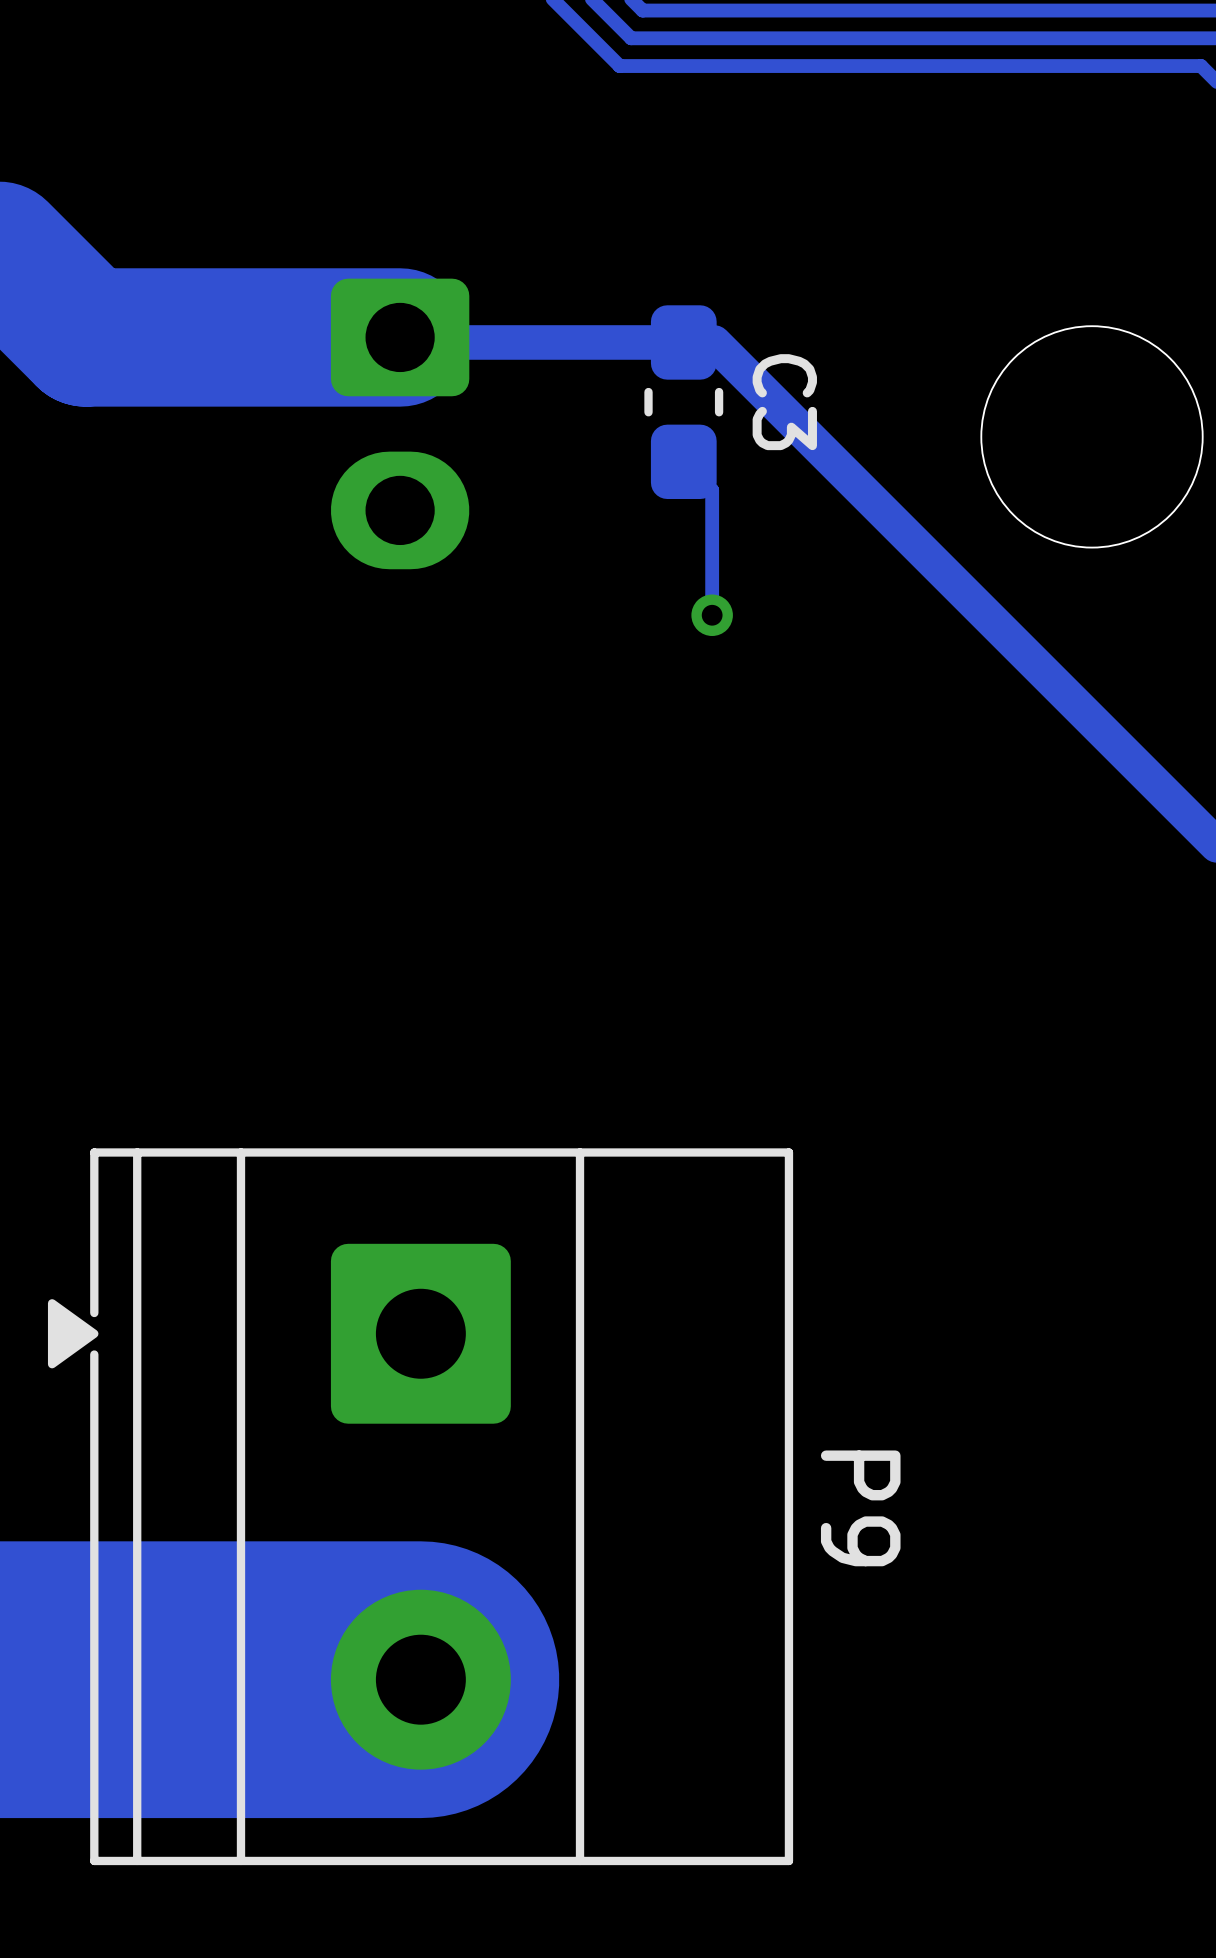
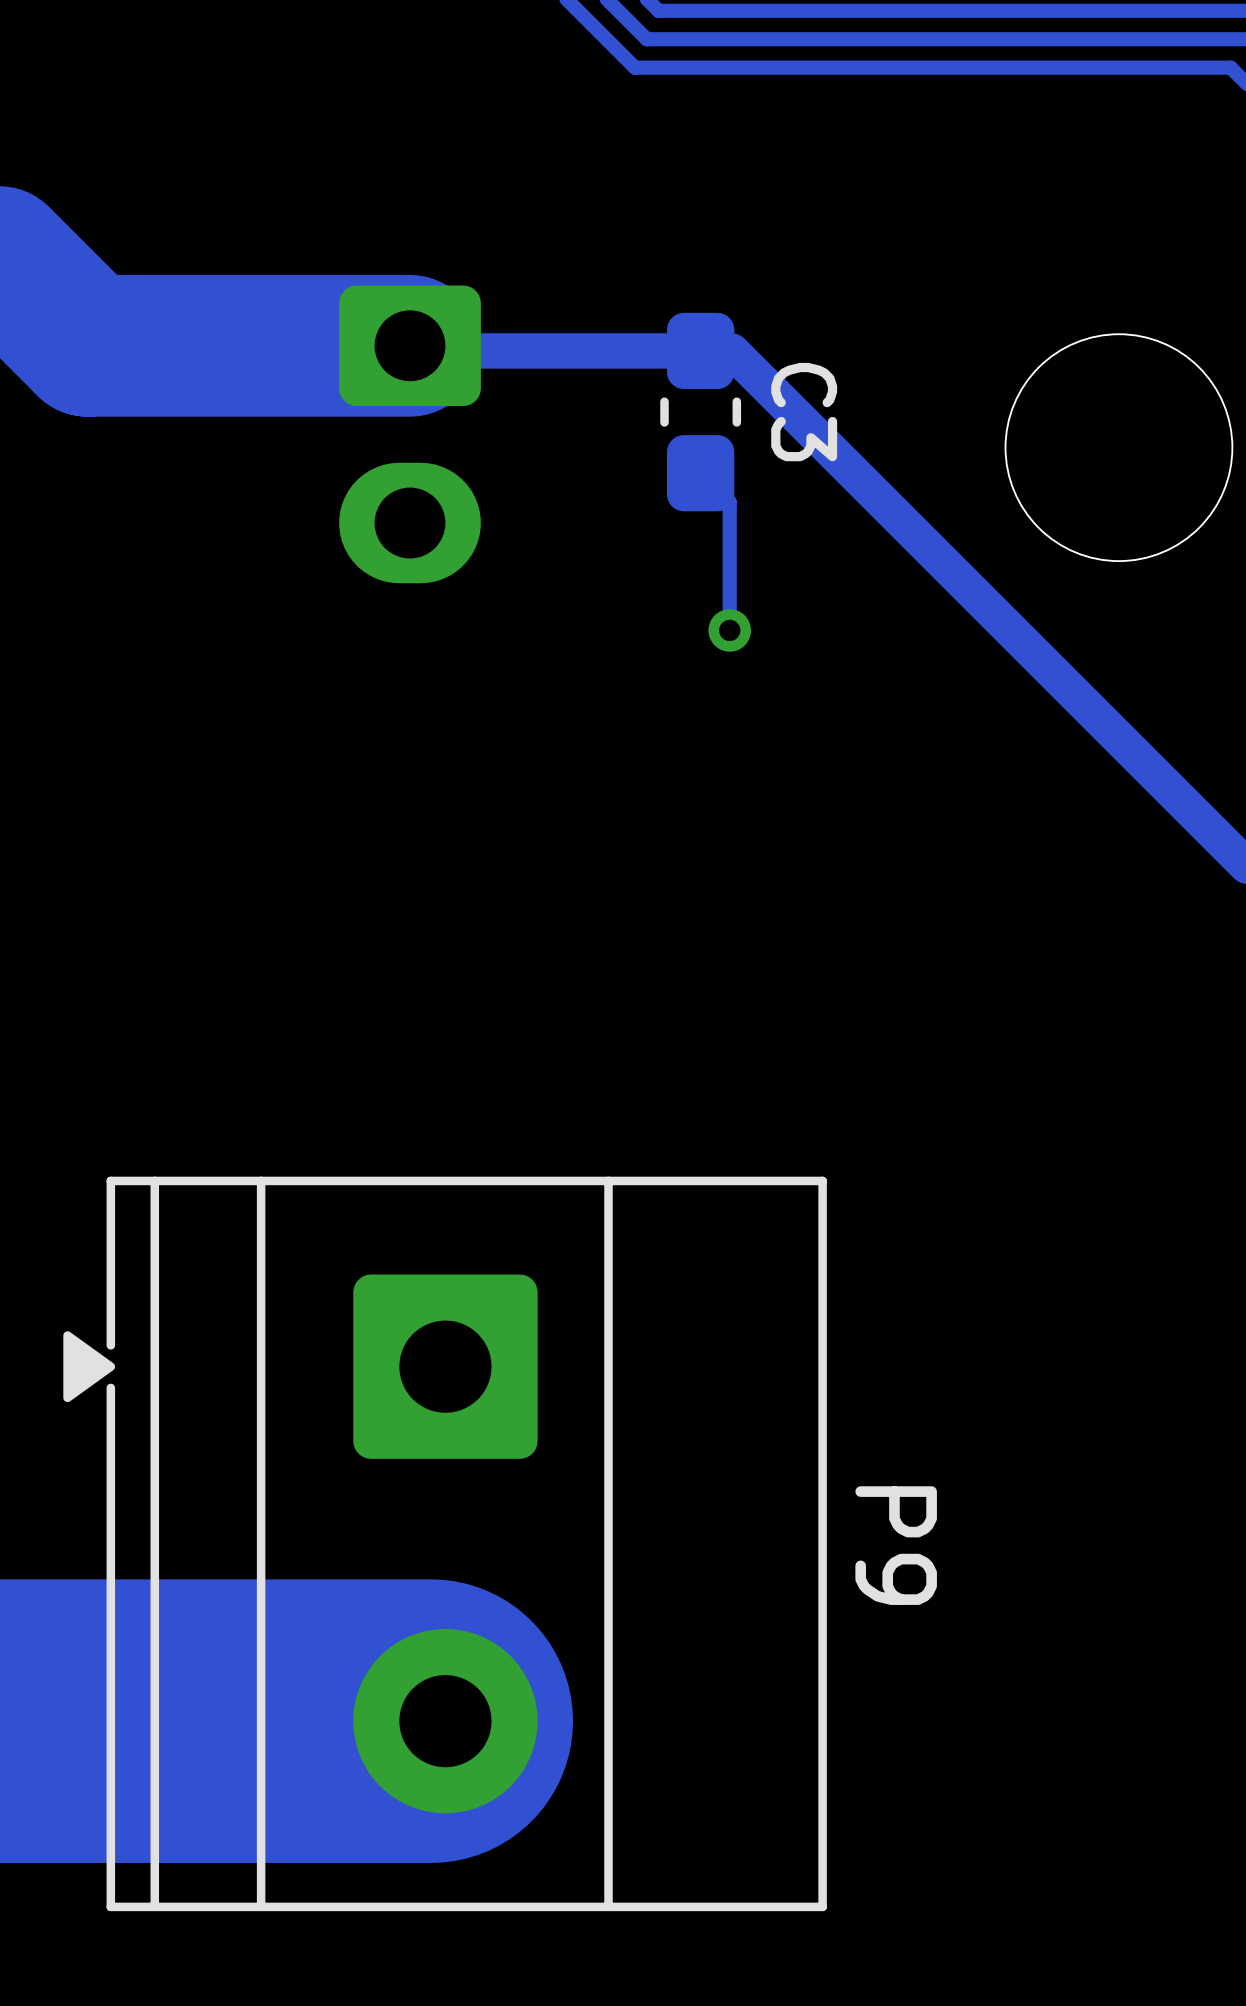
P9 position: (420, 1506) -> (445, 1543)

